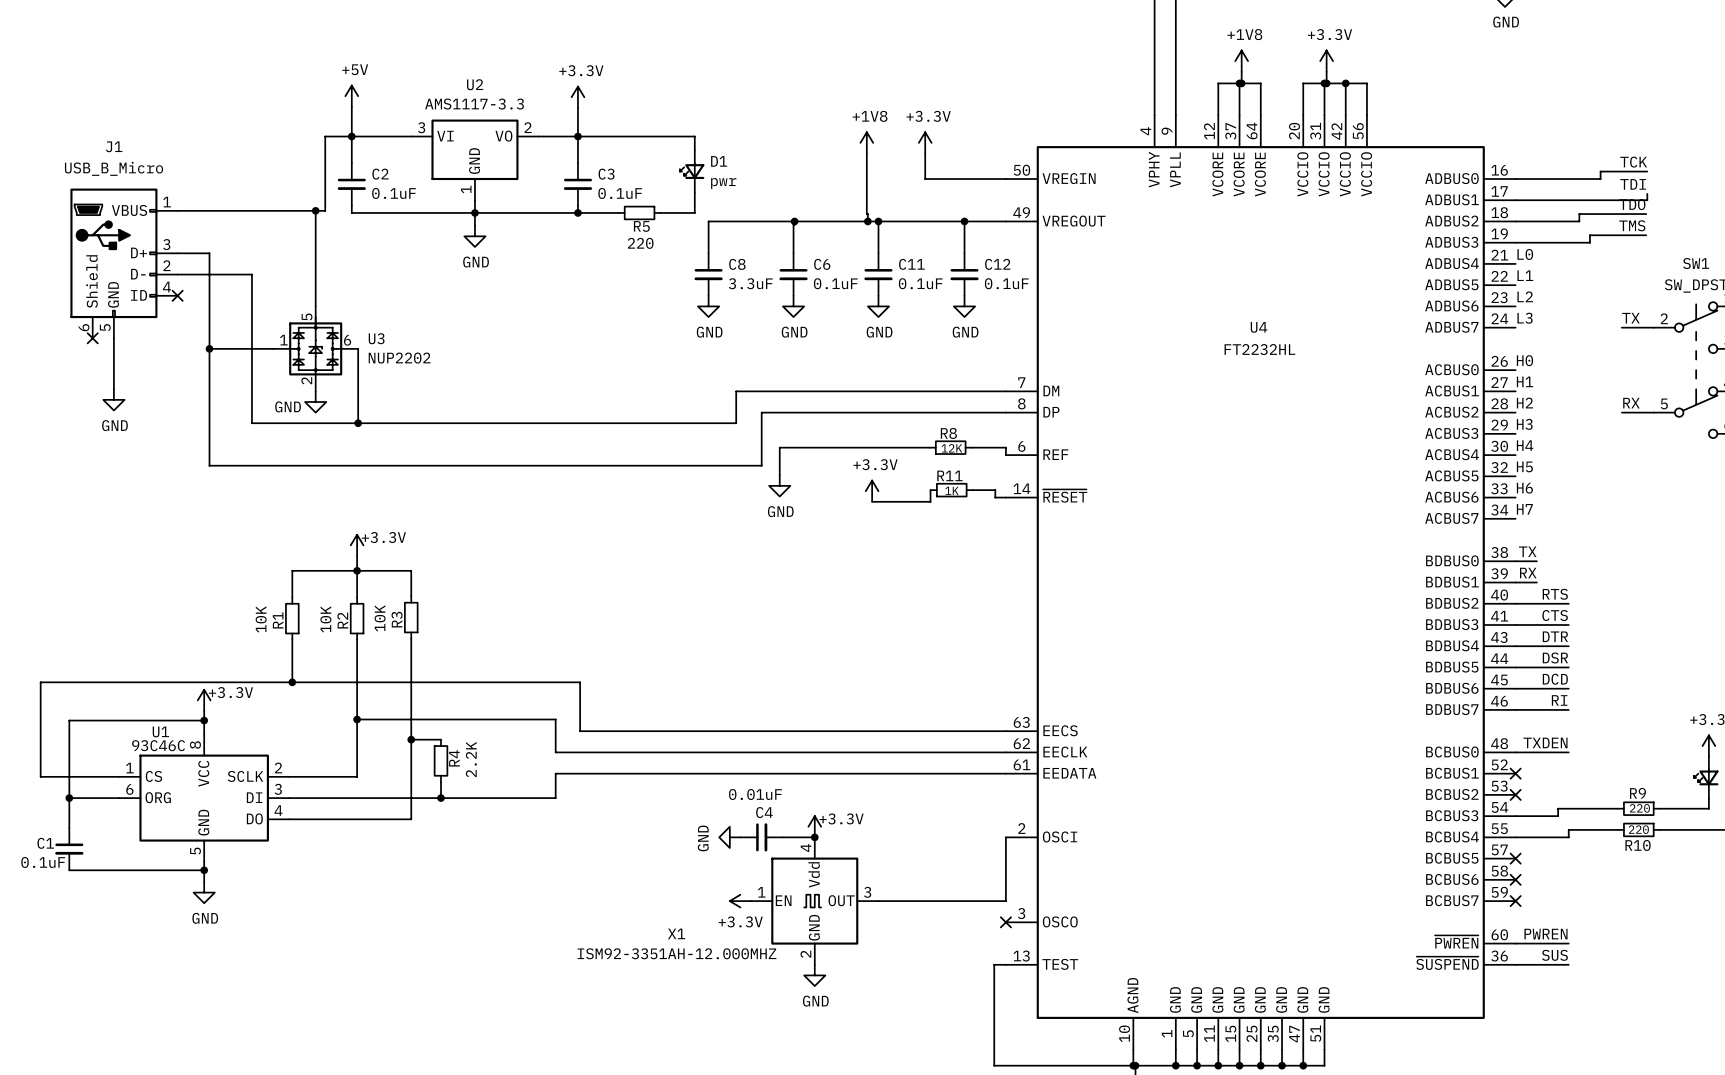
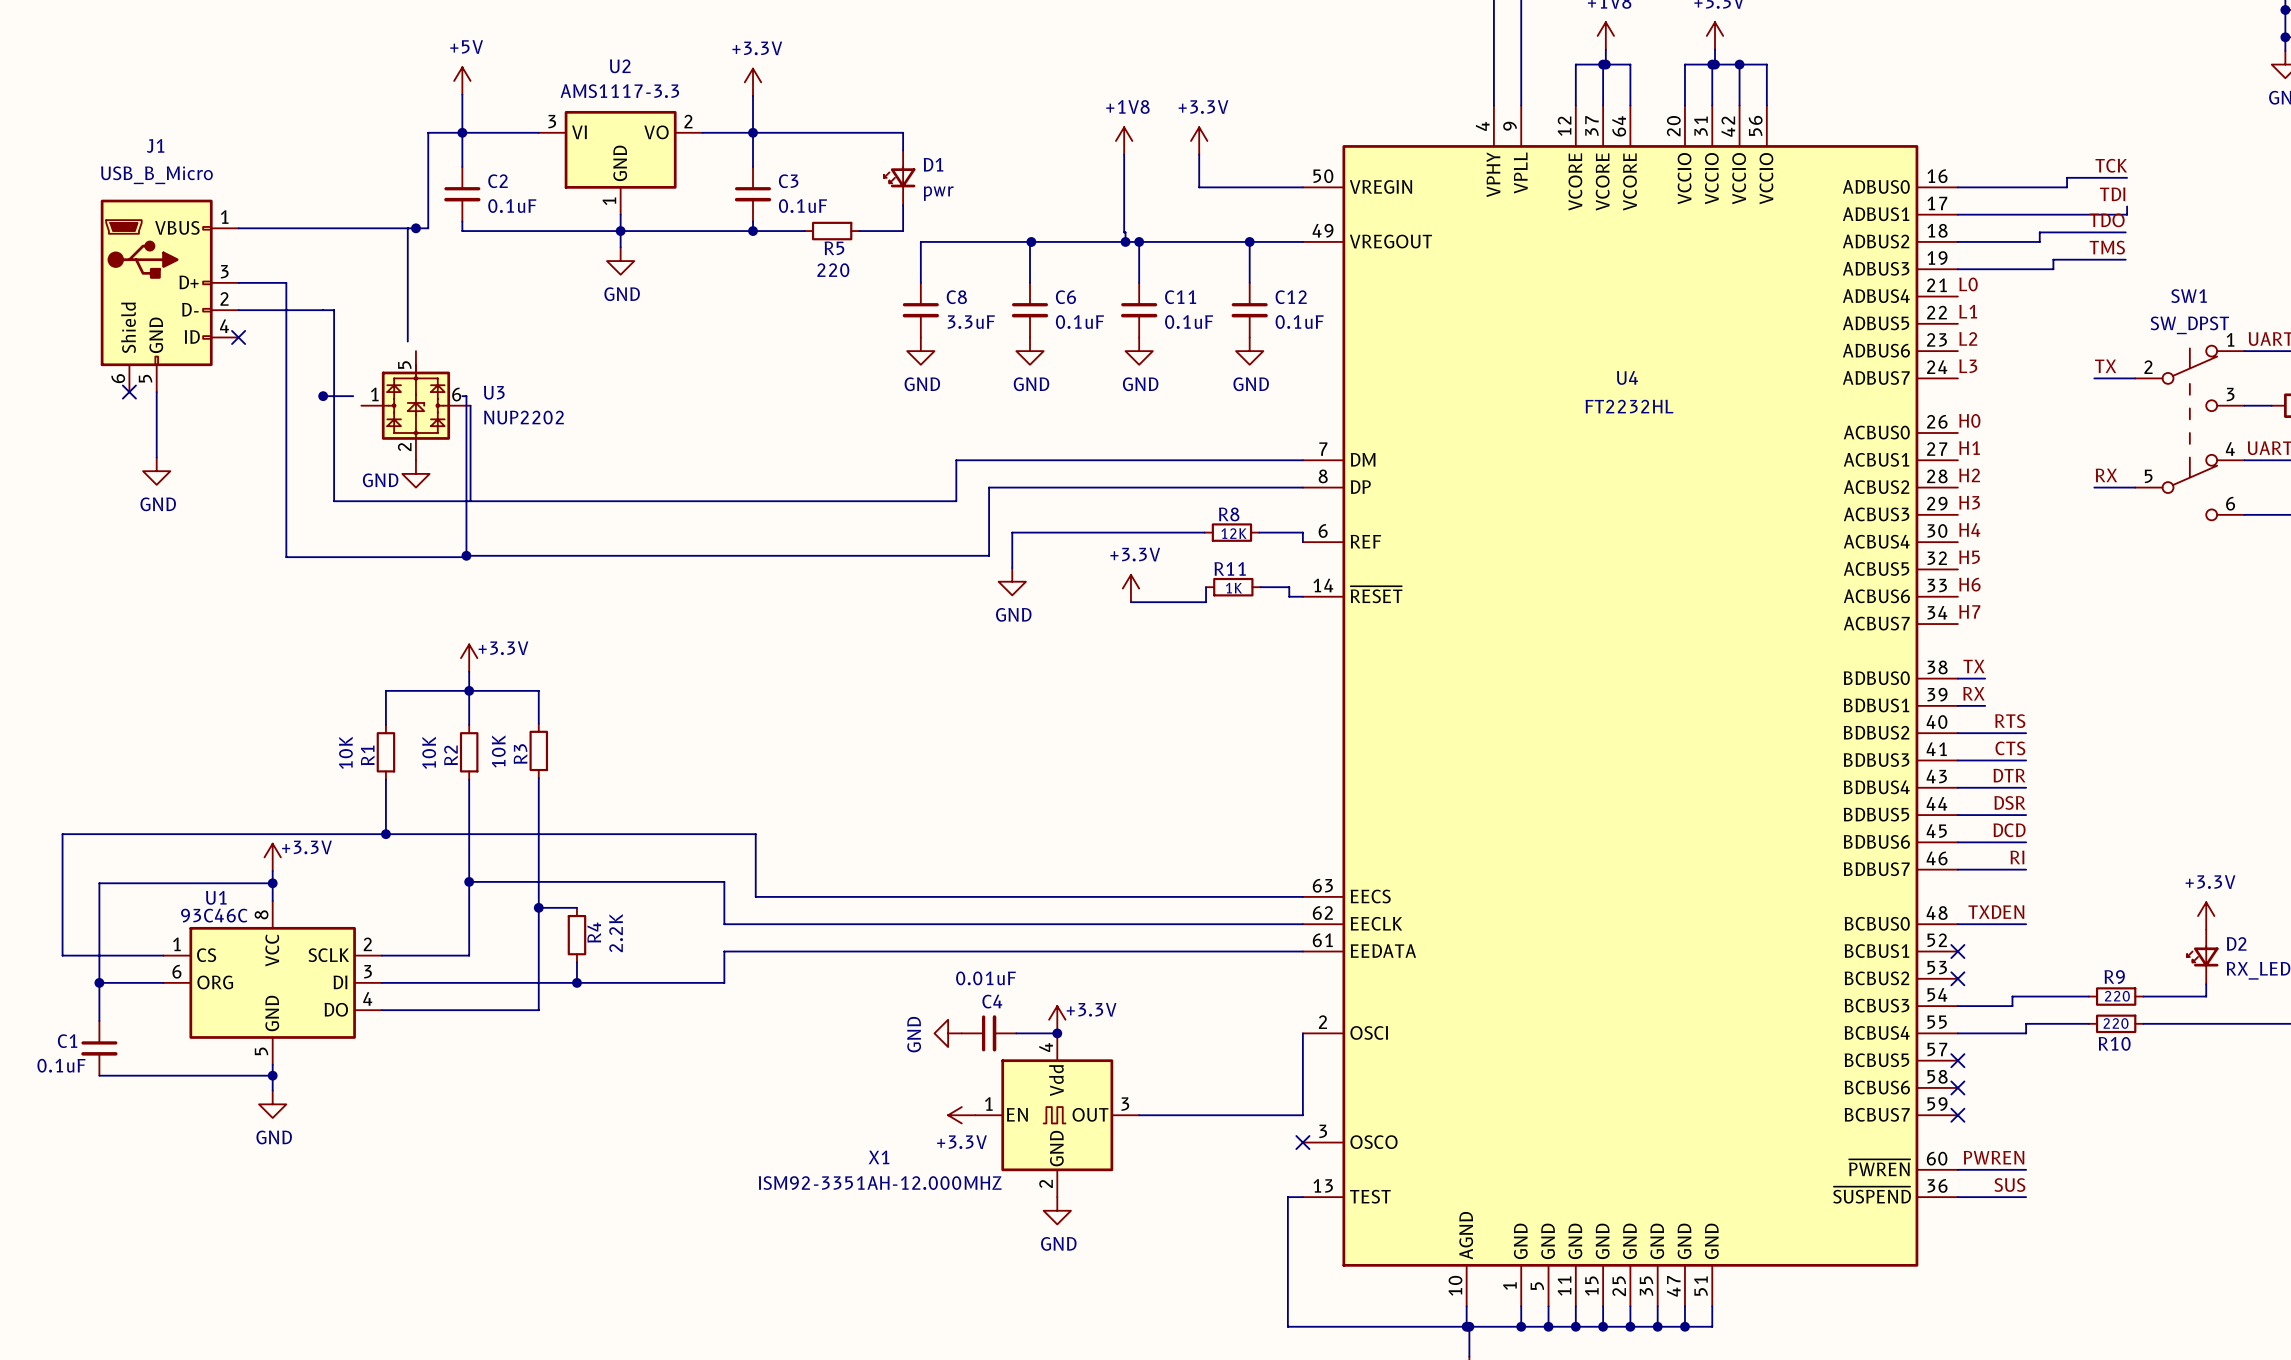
wire: none -> (407, 228) (407, 341)
wire: (315, 210) (315, 306) -> none
wire: (209, 253) (209, 465) (354, 465) -> (279, 282) (286, 282) (286, 557) (466, 557) (466, 396) (462, 396)
wire: none -> (323, 396) (353, 396)
wire: (209, 348) (273, 348) -> none
junction position: (209, 348) -> (323, 396)
junction position: (358, 423) -> (466, 555)

